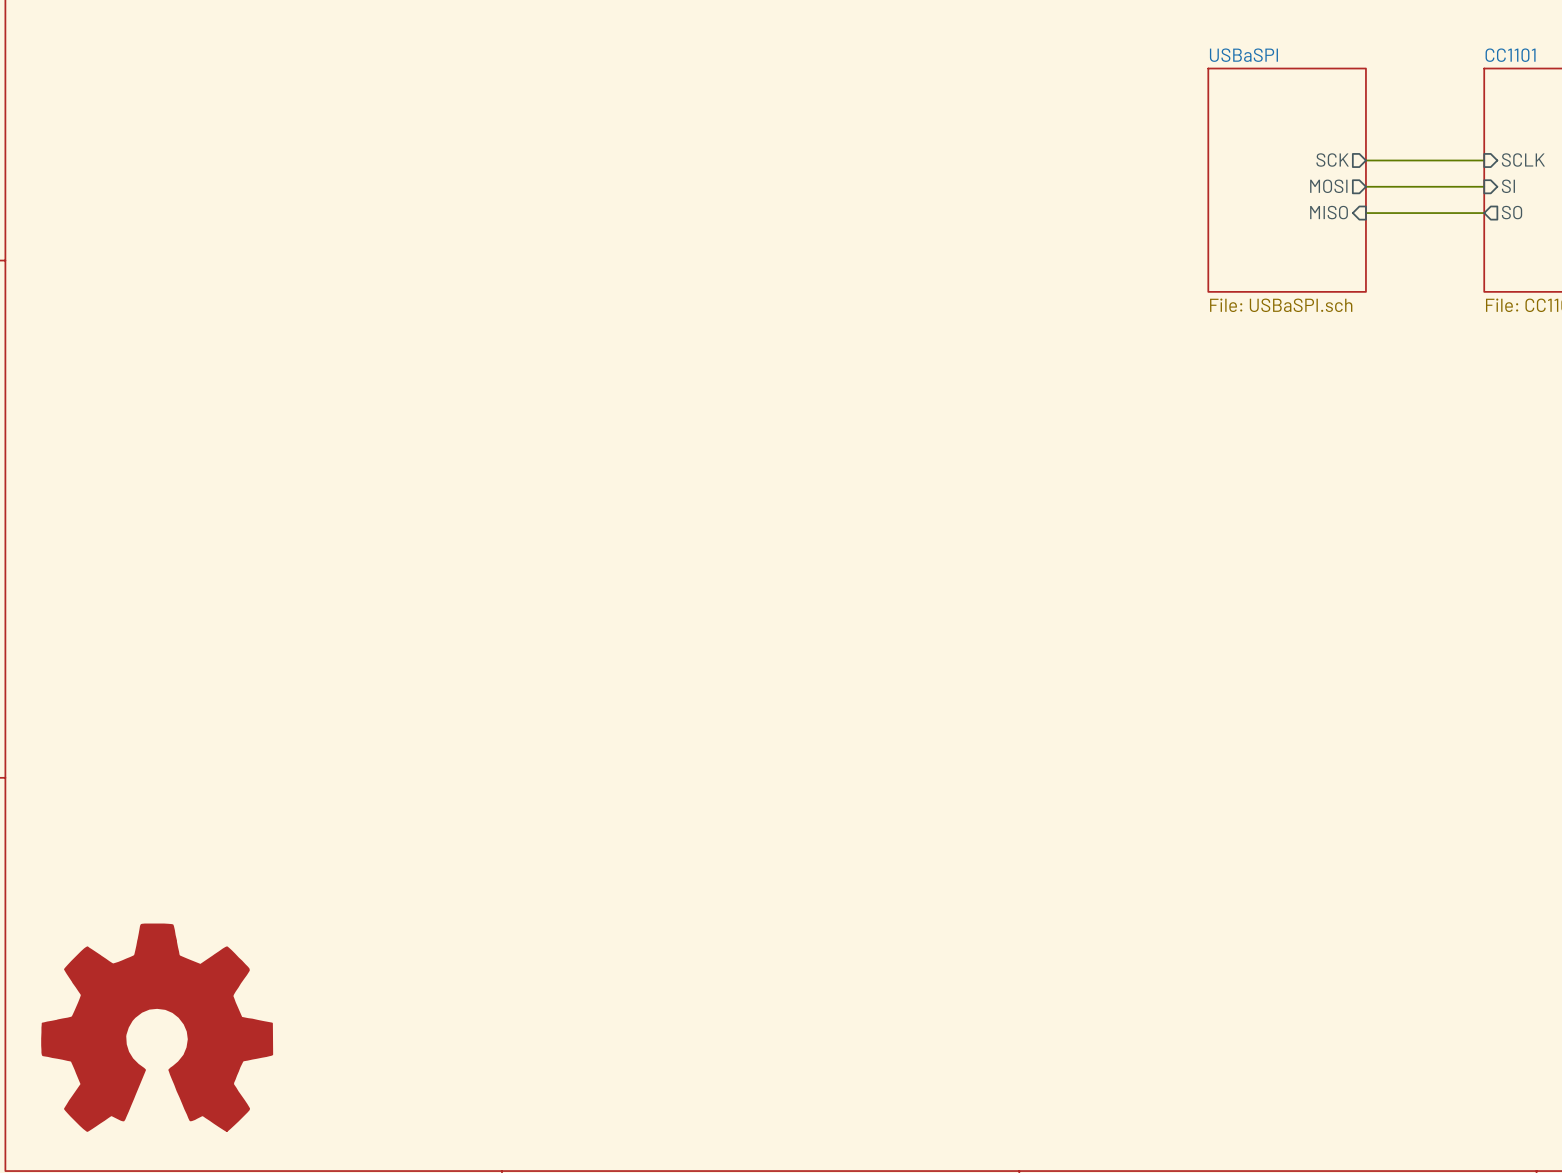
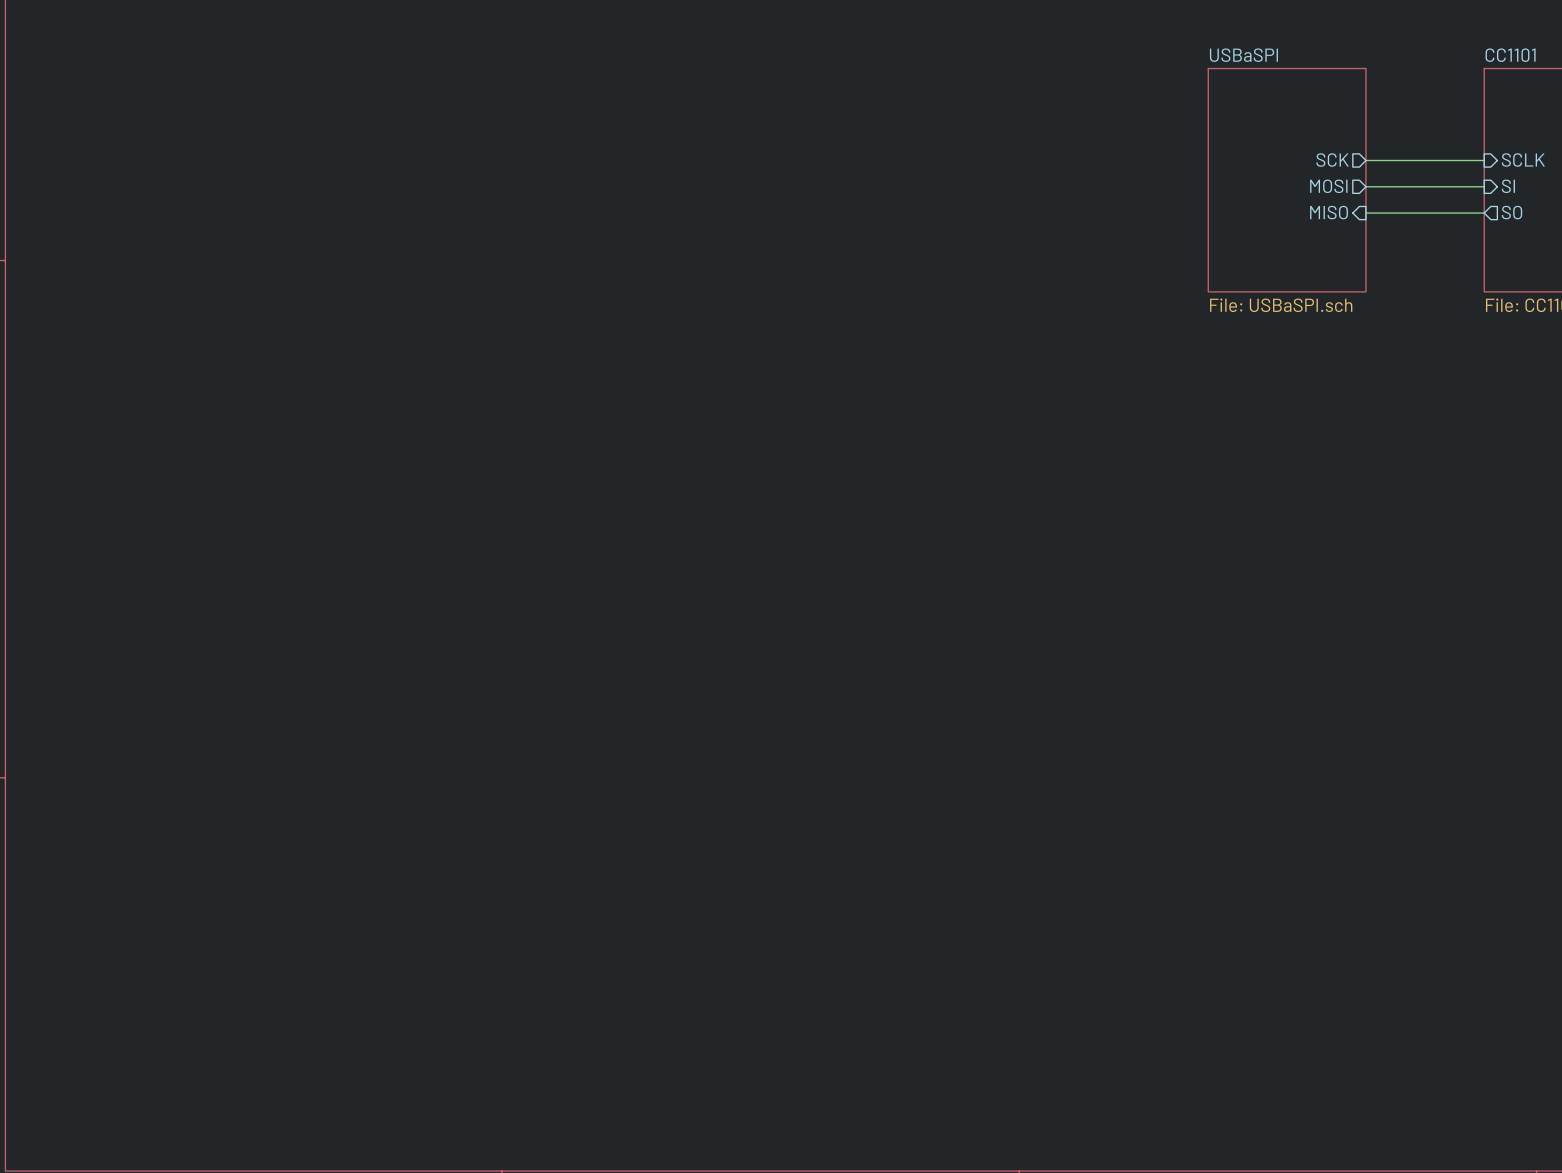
power symbol: (157, 1027) -> none

